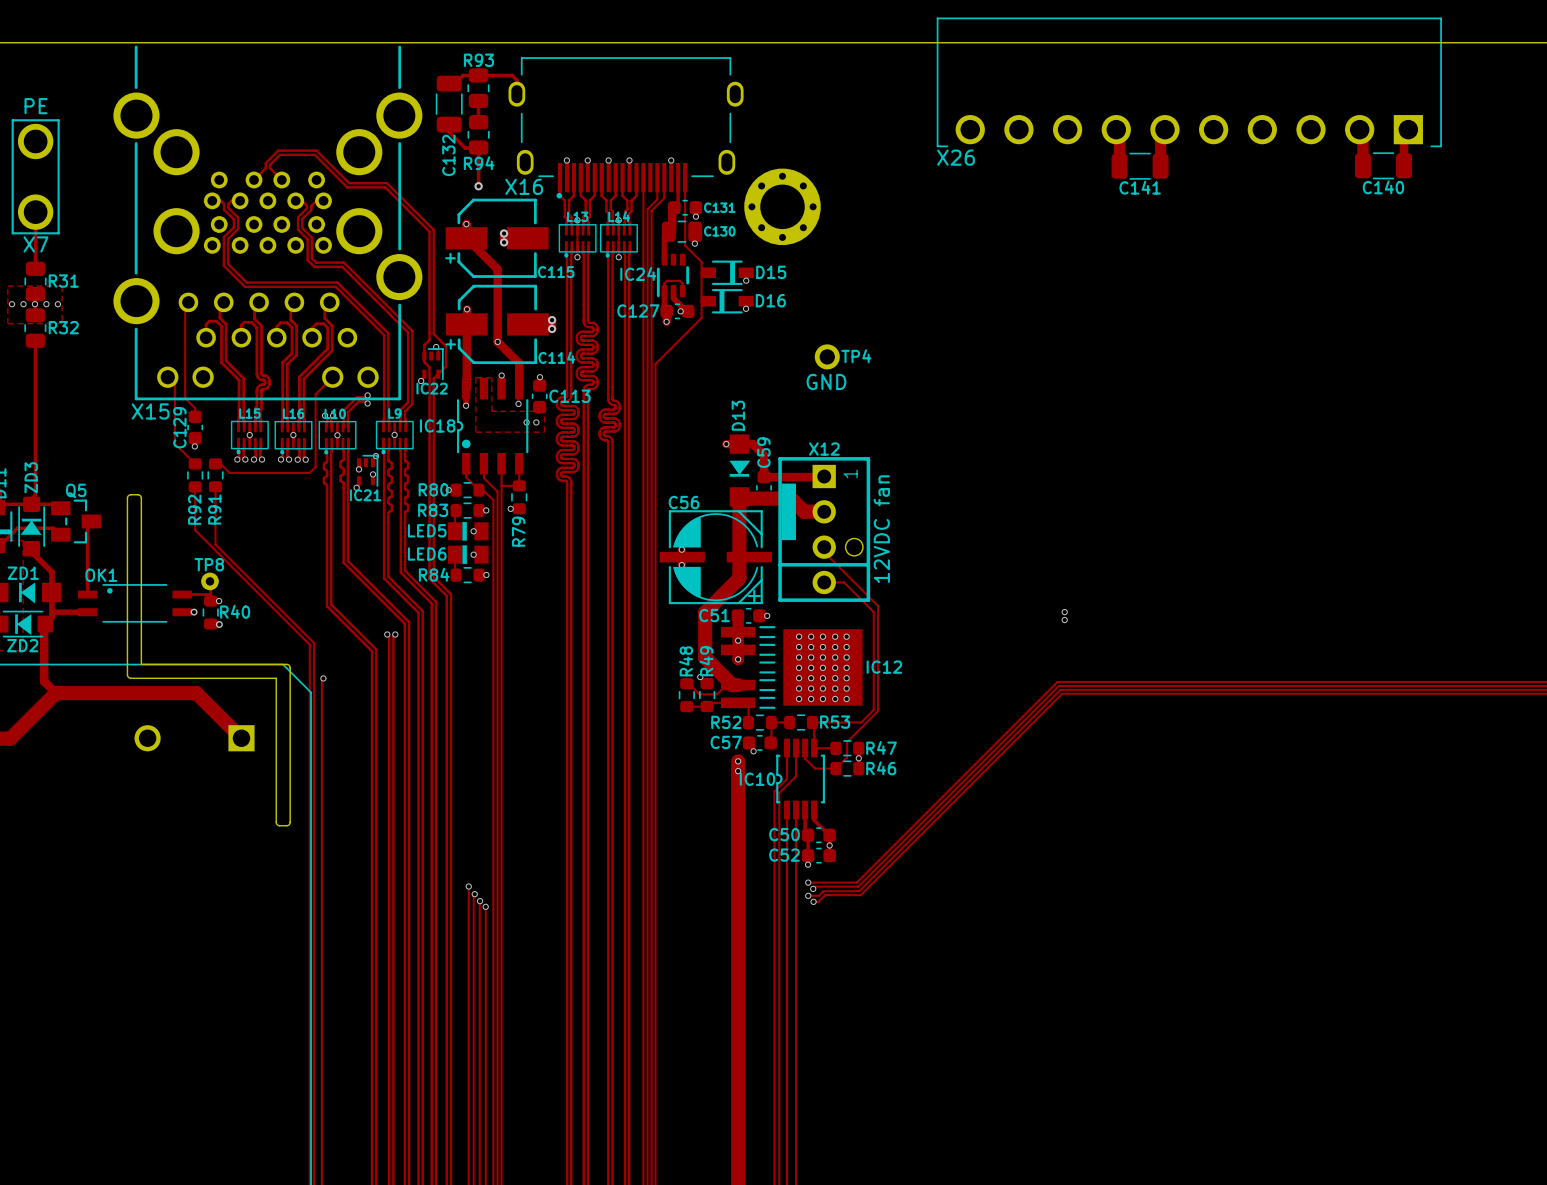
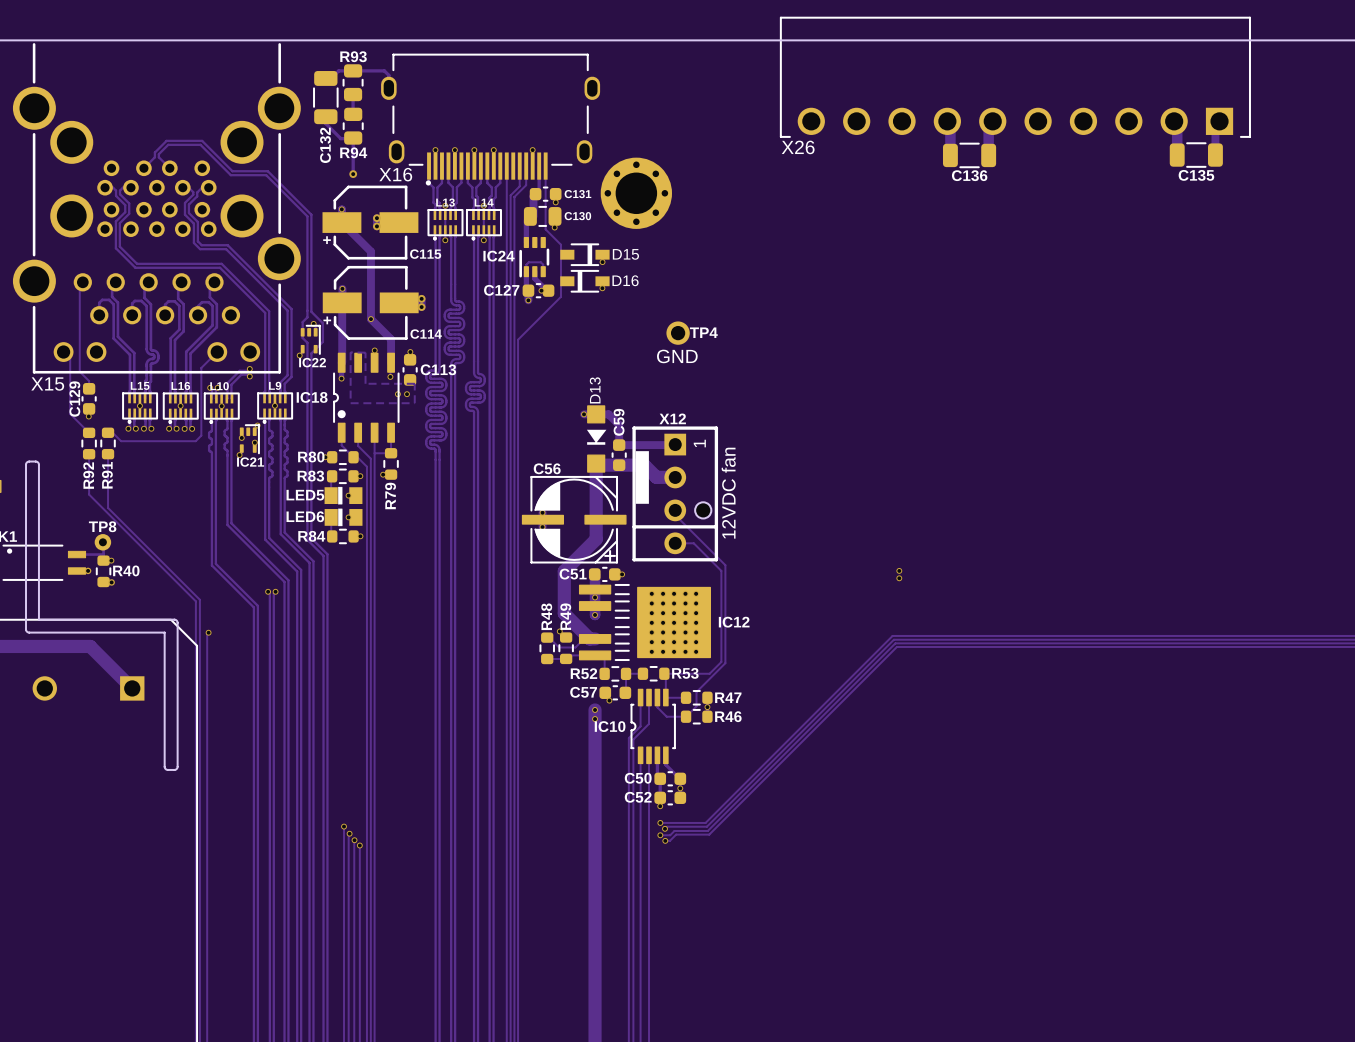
C141 name: C141 (1140, 187) -> C136 (969, 175)
C140 name: C140 (1383, 187) -> C135 (1196, 175)

